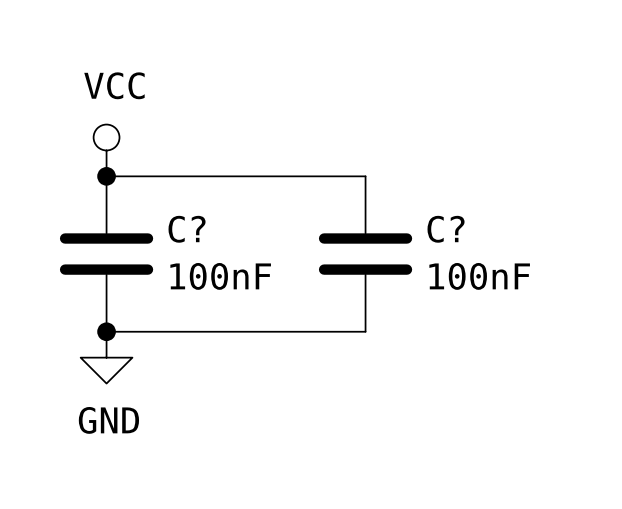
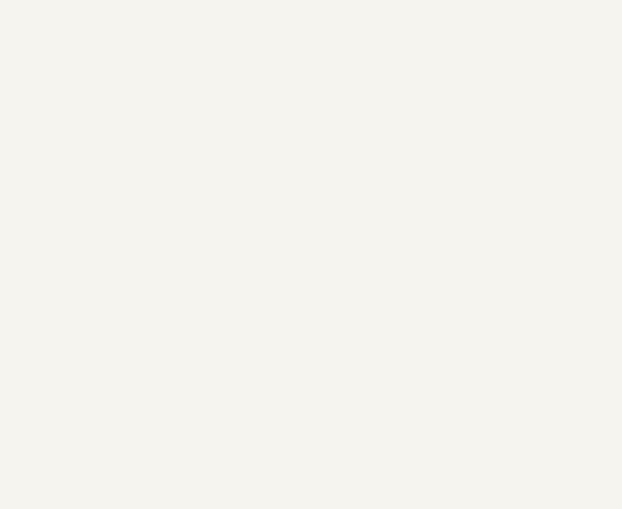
power symbol: VCC (106, 150) -> none
wire: (106, 176) (365, 176) -> none
junction: (106, 176) -> none
C?: 100nF (106, 254) -> none
C?: 100nF (365, 254) -> none
wire: (106, 331) (365, 331) -> none
junction: (106, 331) -> none
power symbol: GND (106, 357) -> none

